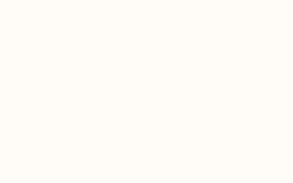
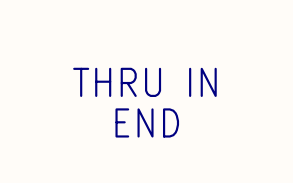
text: none -> THRU IN (144, 82)
text: none -> END (147, 122)

